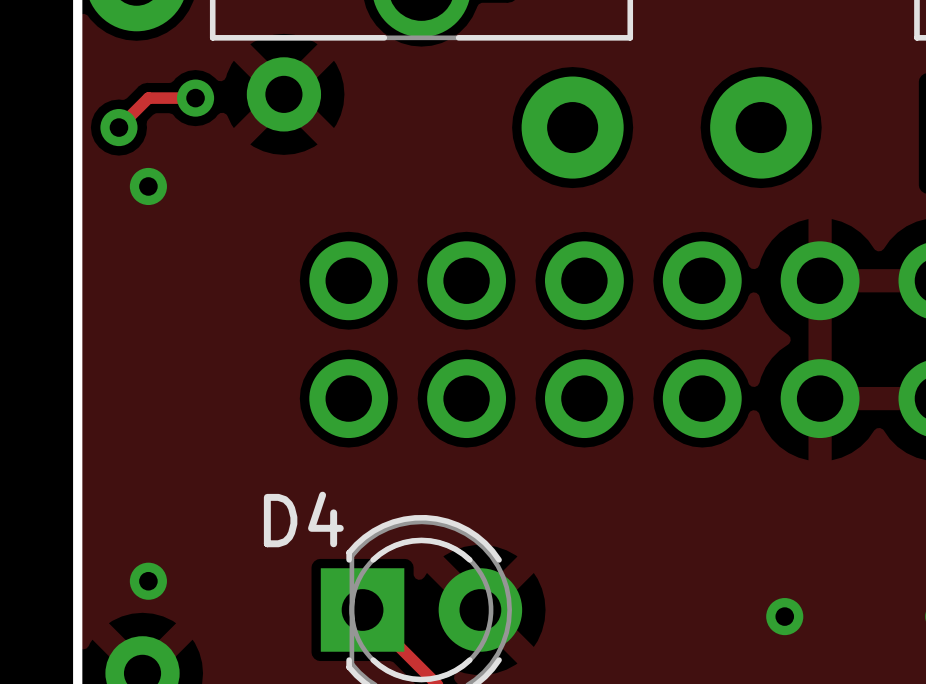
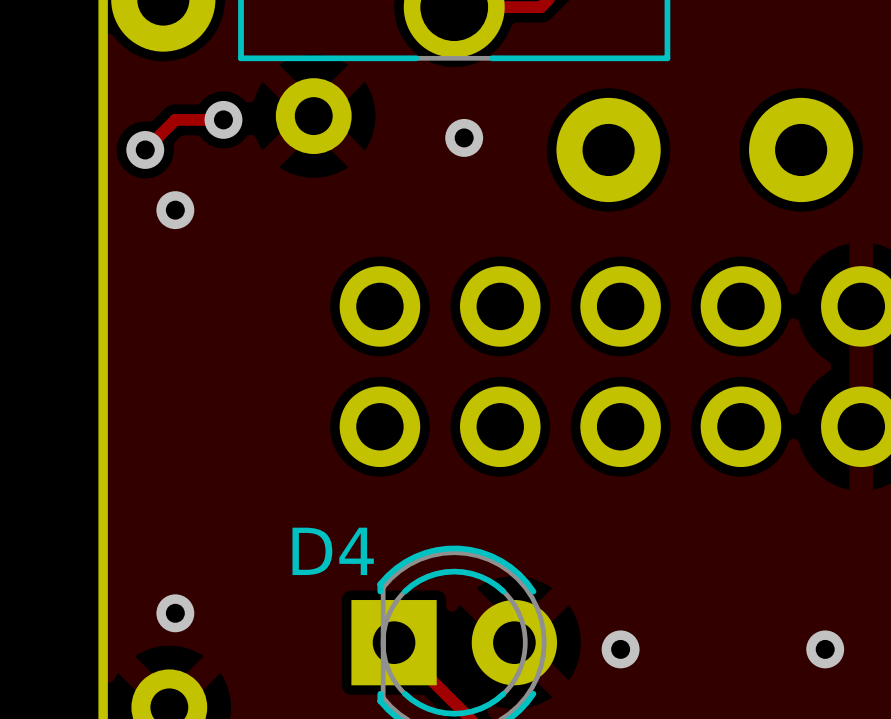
via: none -> (464, 137)
via: none -> (620, 649)

